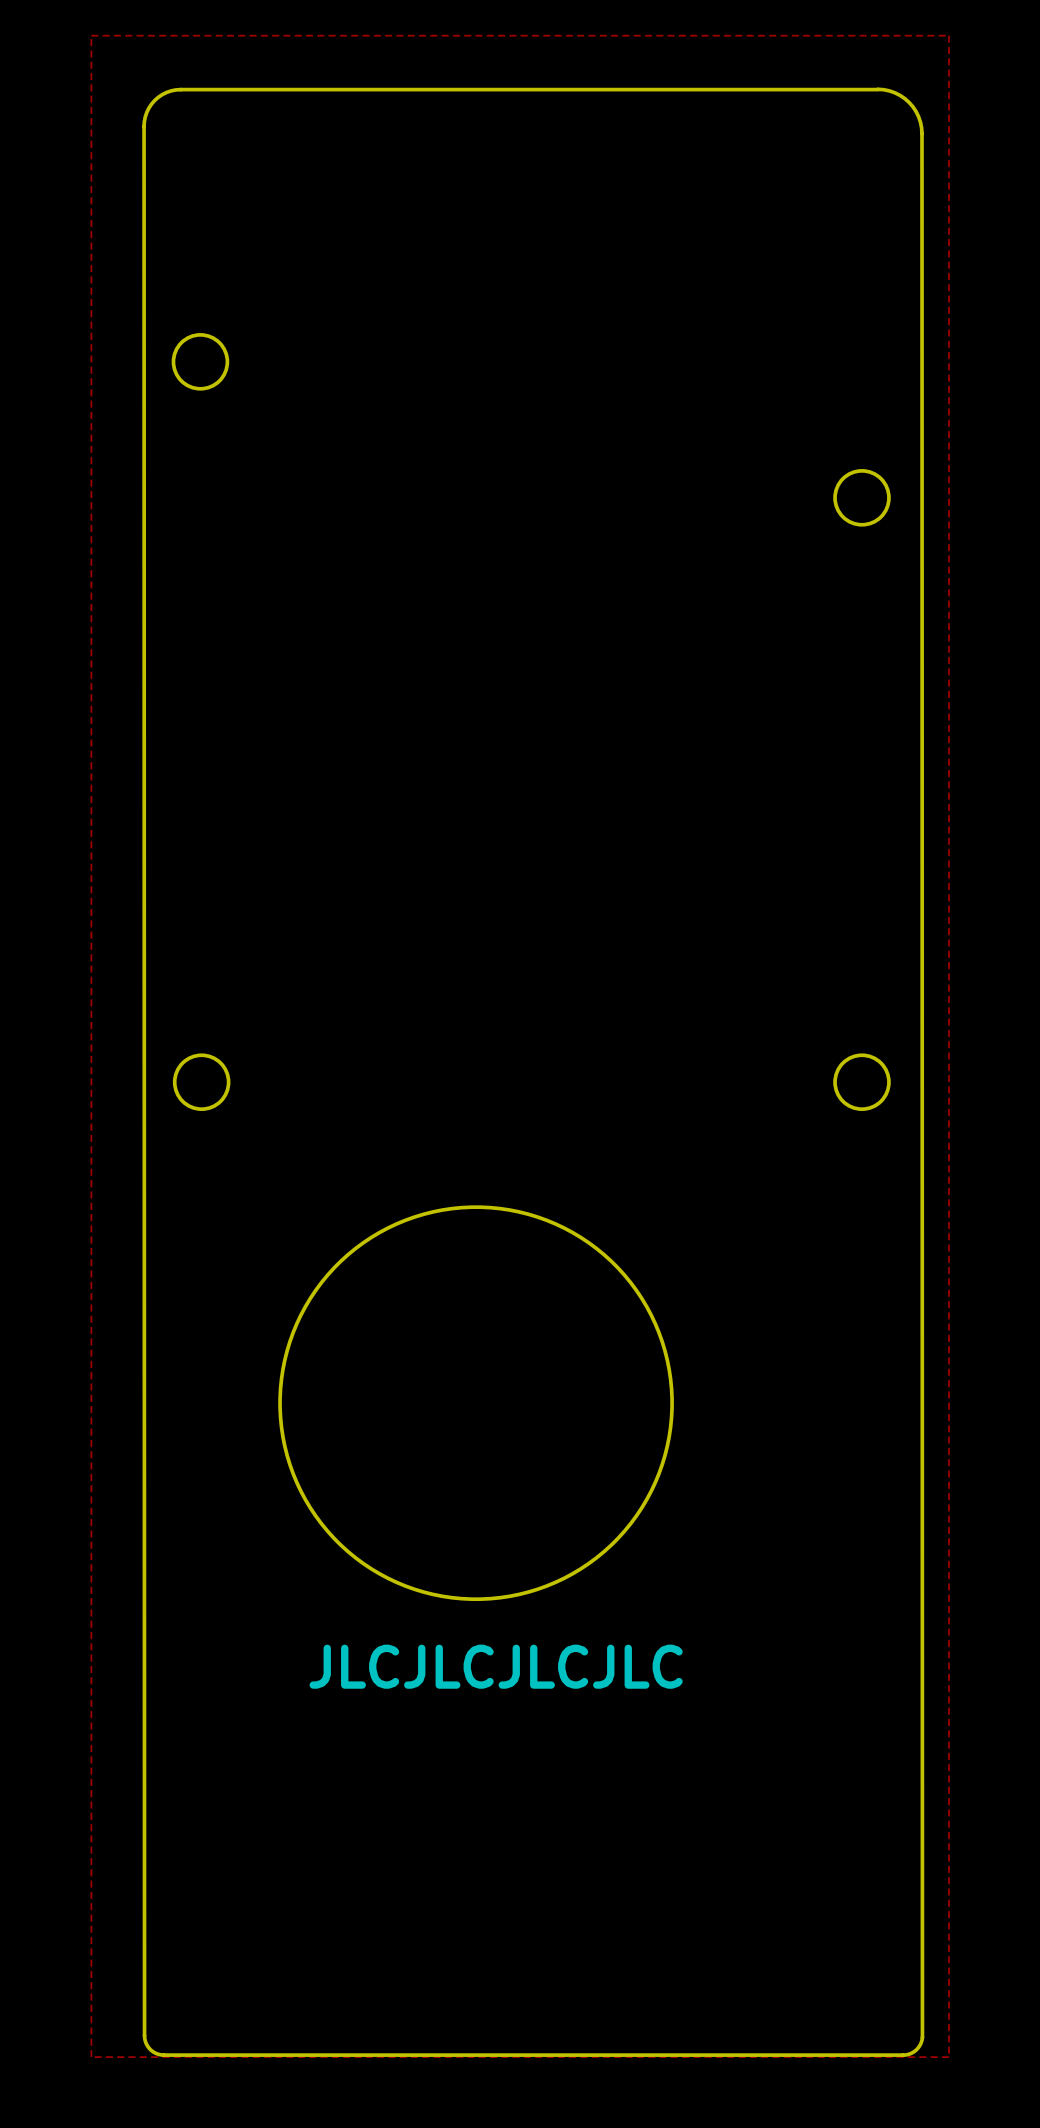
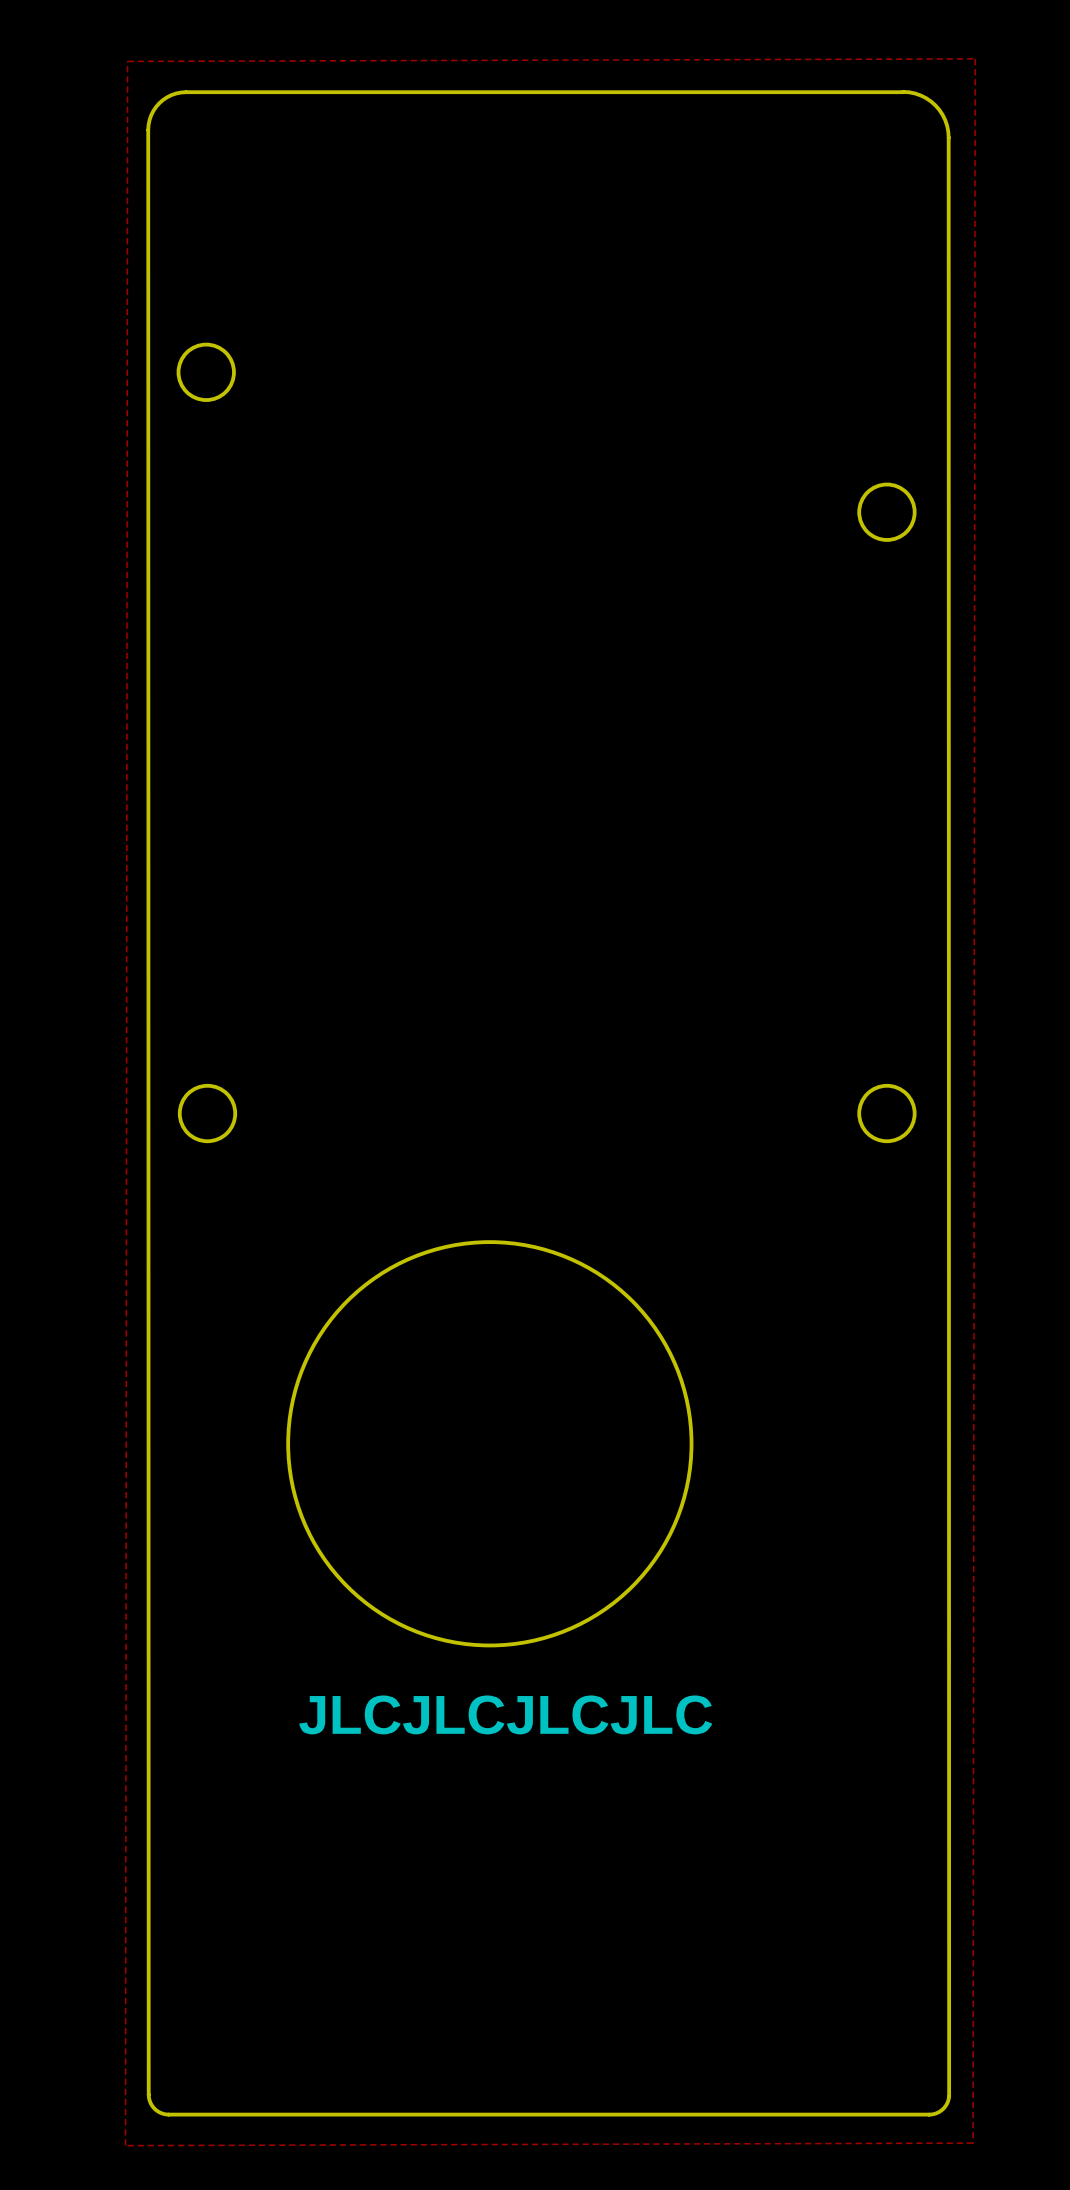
top zone outline: (948, 35) (948, 2057) (91, 2057) (91, 35) (948, 35) -> (975, 58) (973, 2143) (125, 2145) (127, 61) (975, 58)

